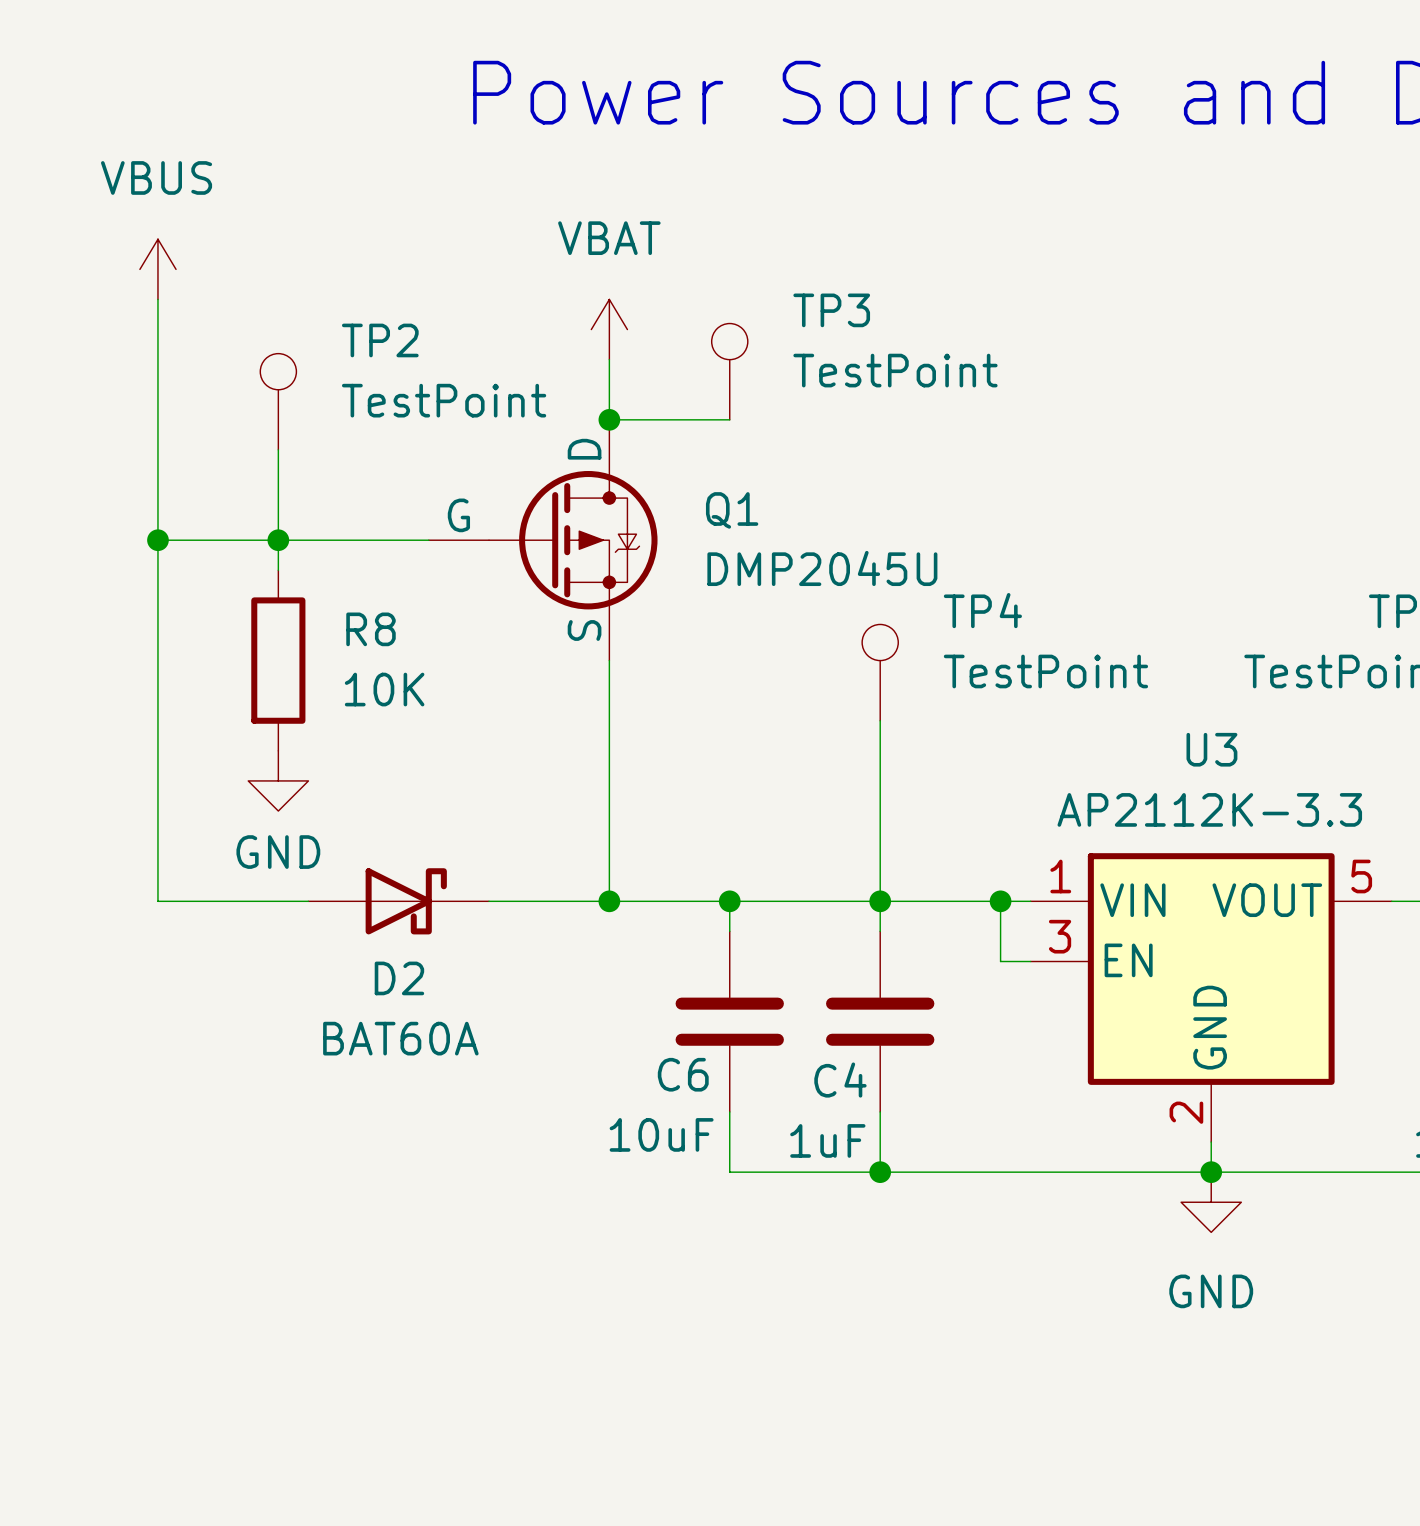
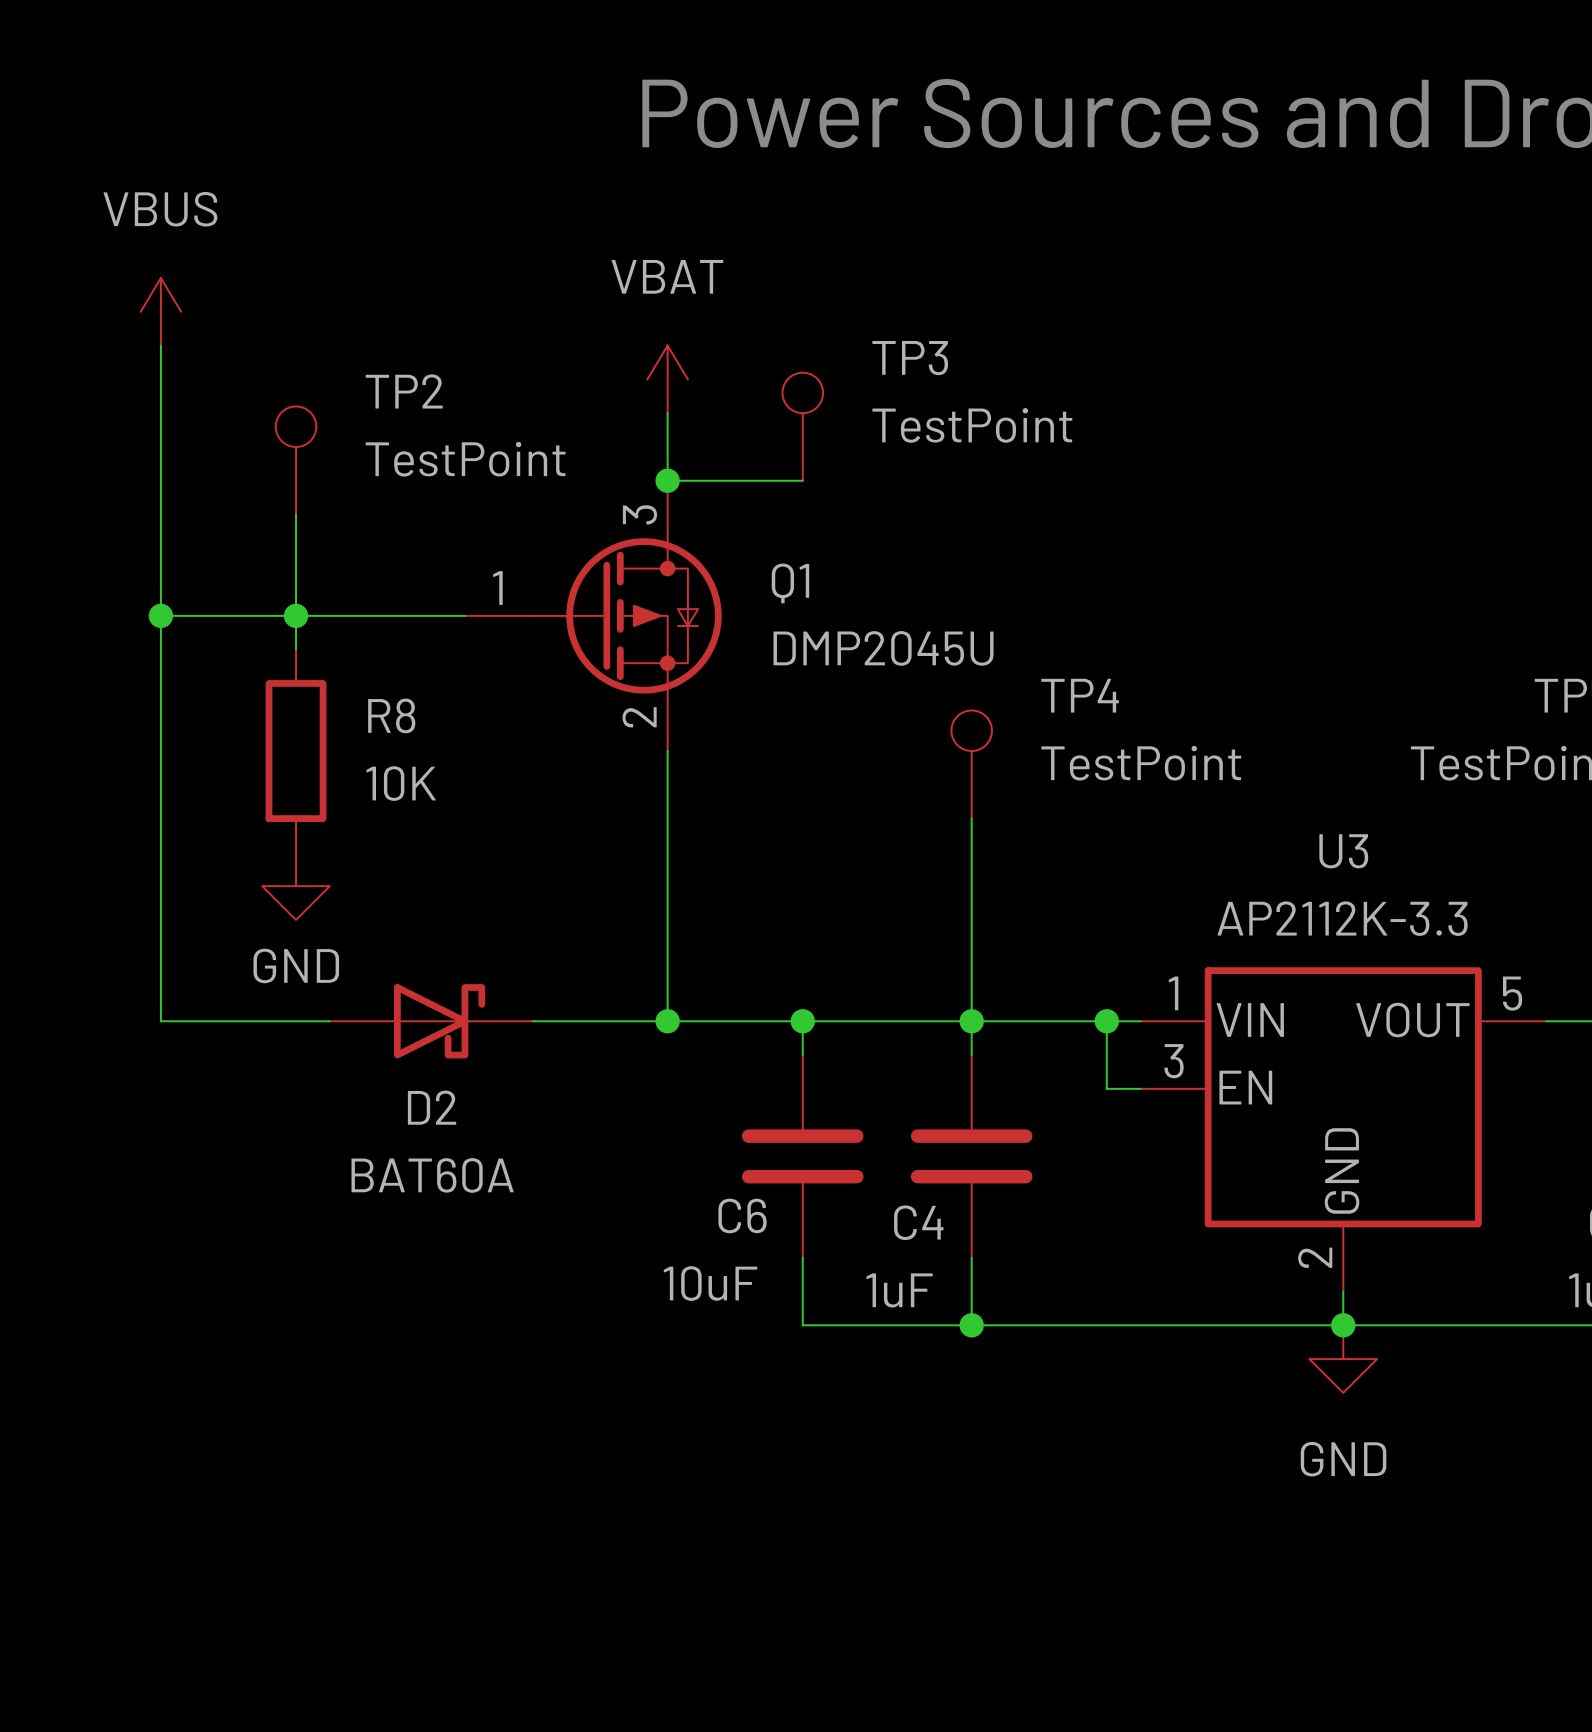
Q1 symbol: [428, 419, 658, 661] -> [464, 480, 722, 752]

